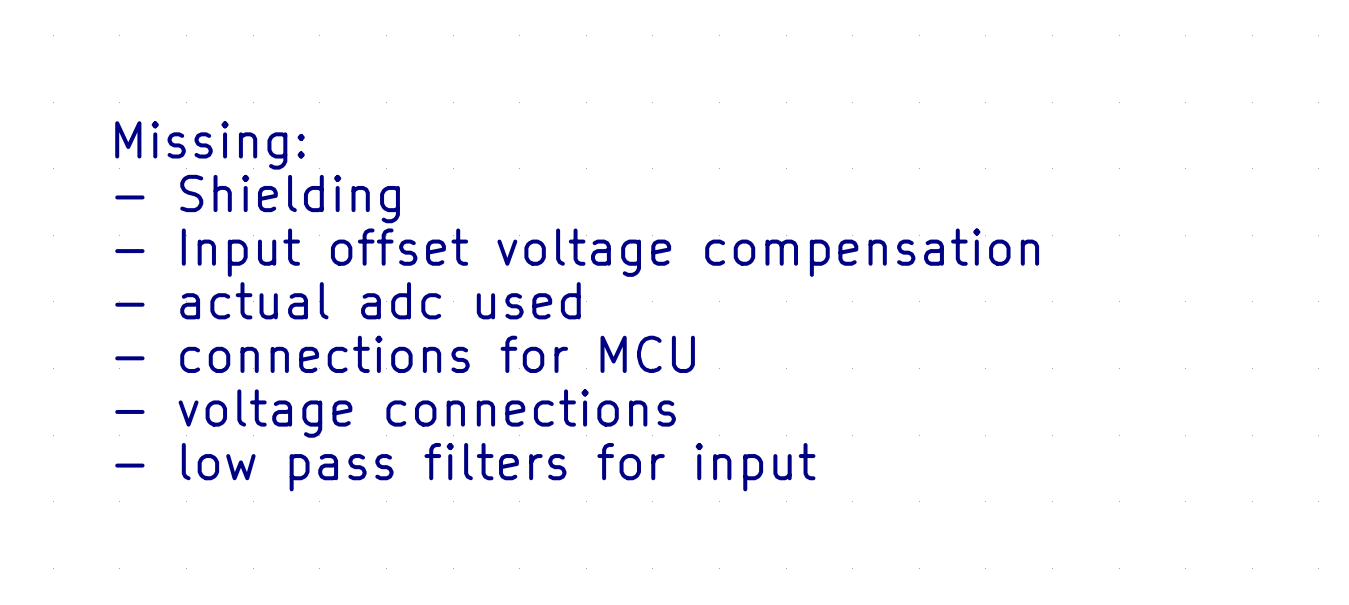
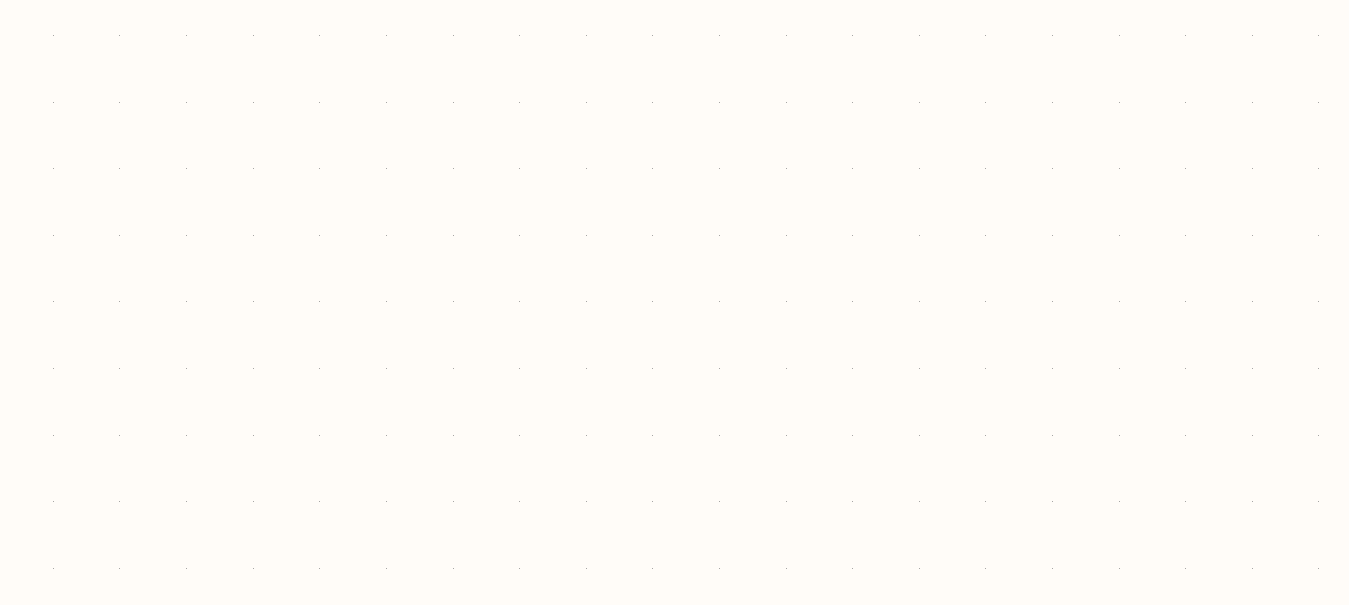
text: Missing: (209, 145) -> none
text: - Shielding (257, 199) -> none
text: - Input offset voltage compensation (577, 252) -> none
text: - actual adc used (347, 300) -> none
text: - connections for MCU (405, 354) -> none
text: - voltage connections (395, 413) -> none
text: - low pass filters for input (465, 467) -> none

